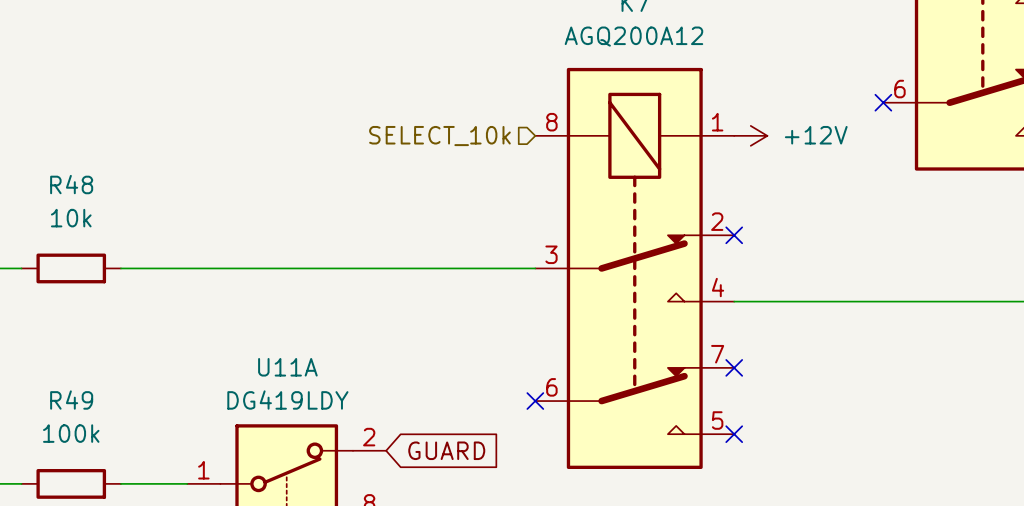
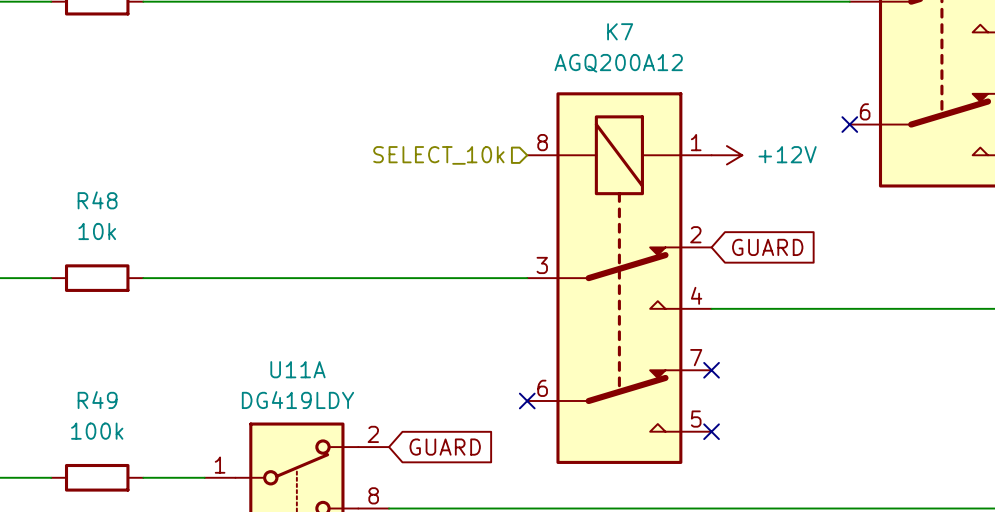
no-connect mark: (734, 235) -> none
global label: none -> GUARD (767, 247)

